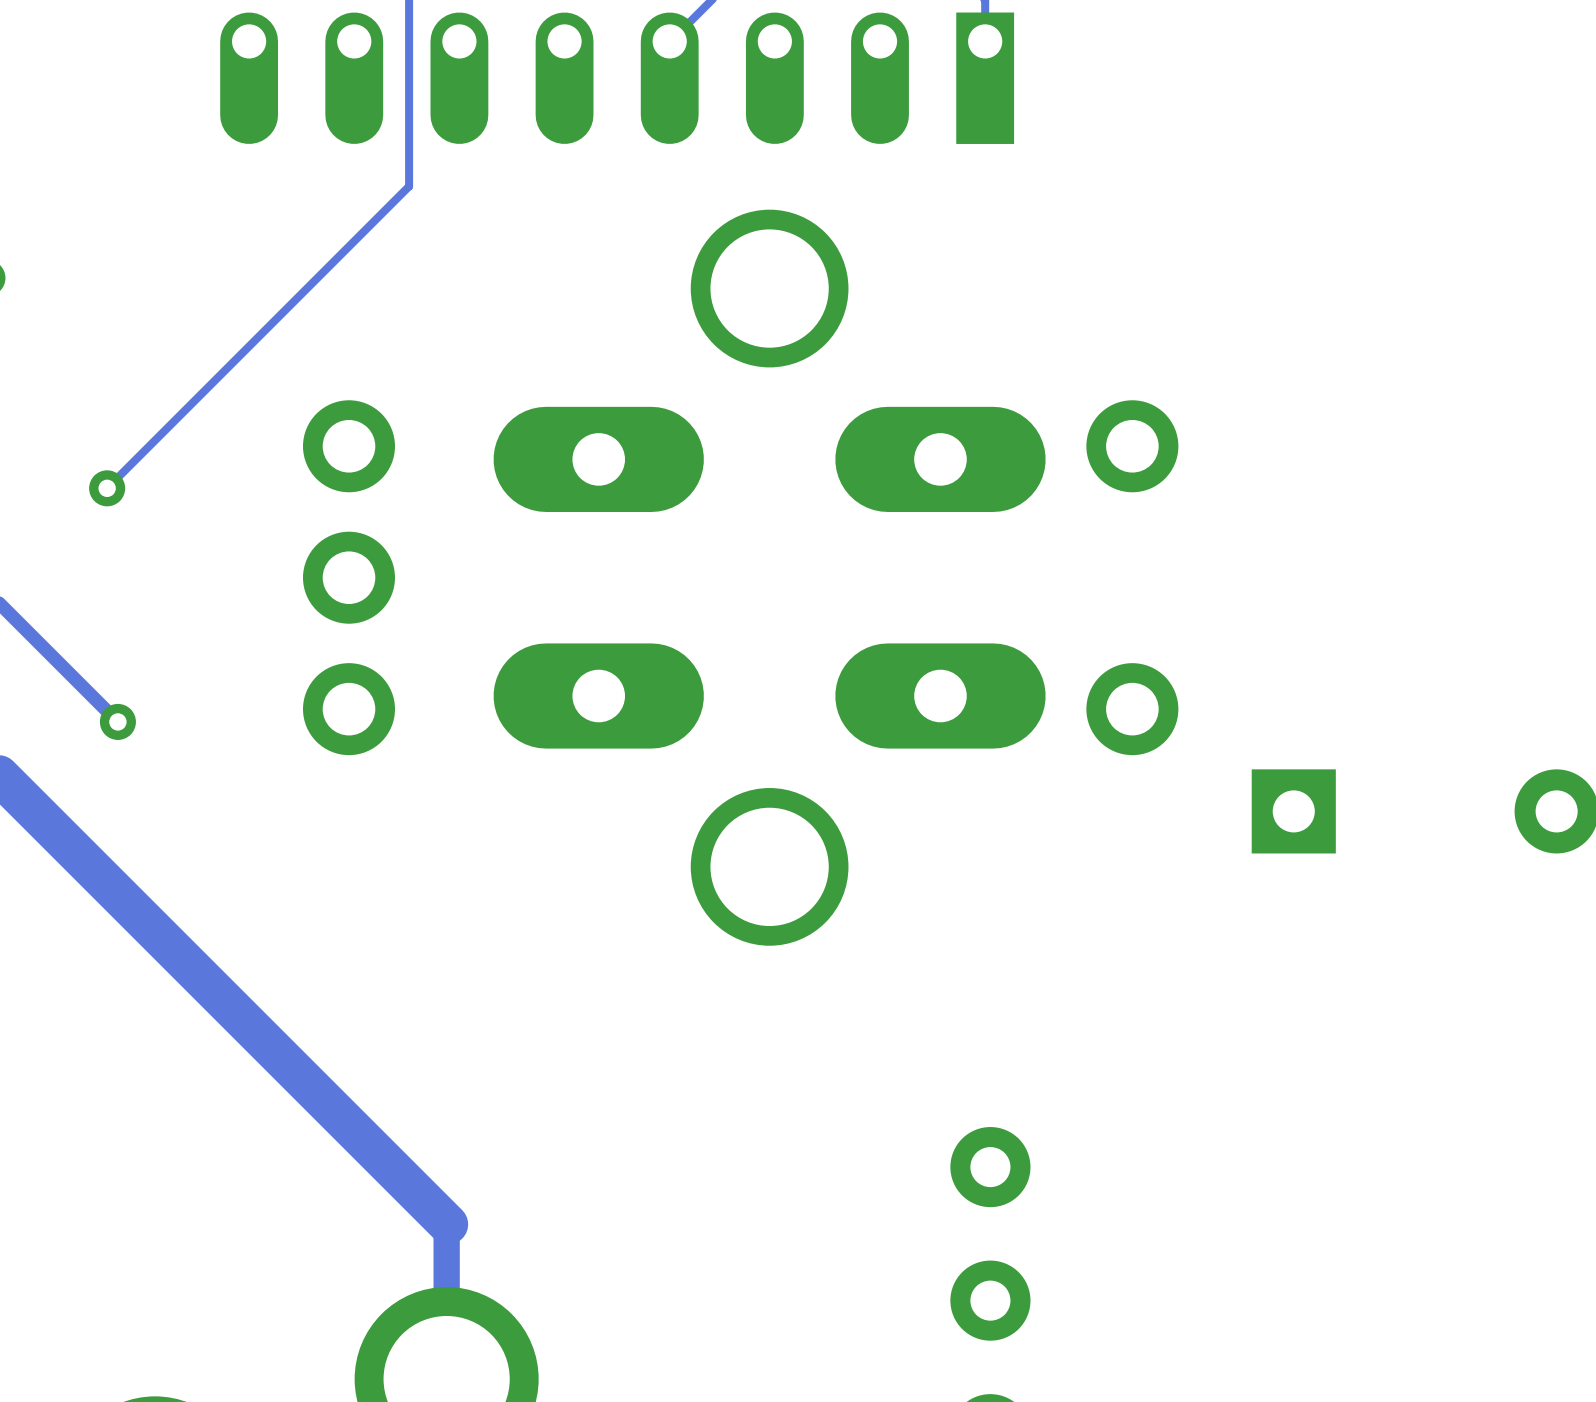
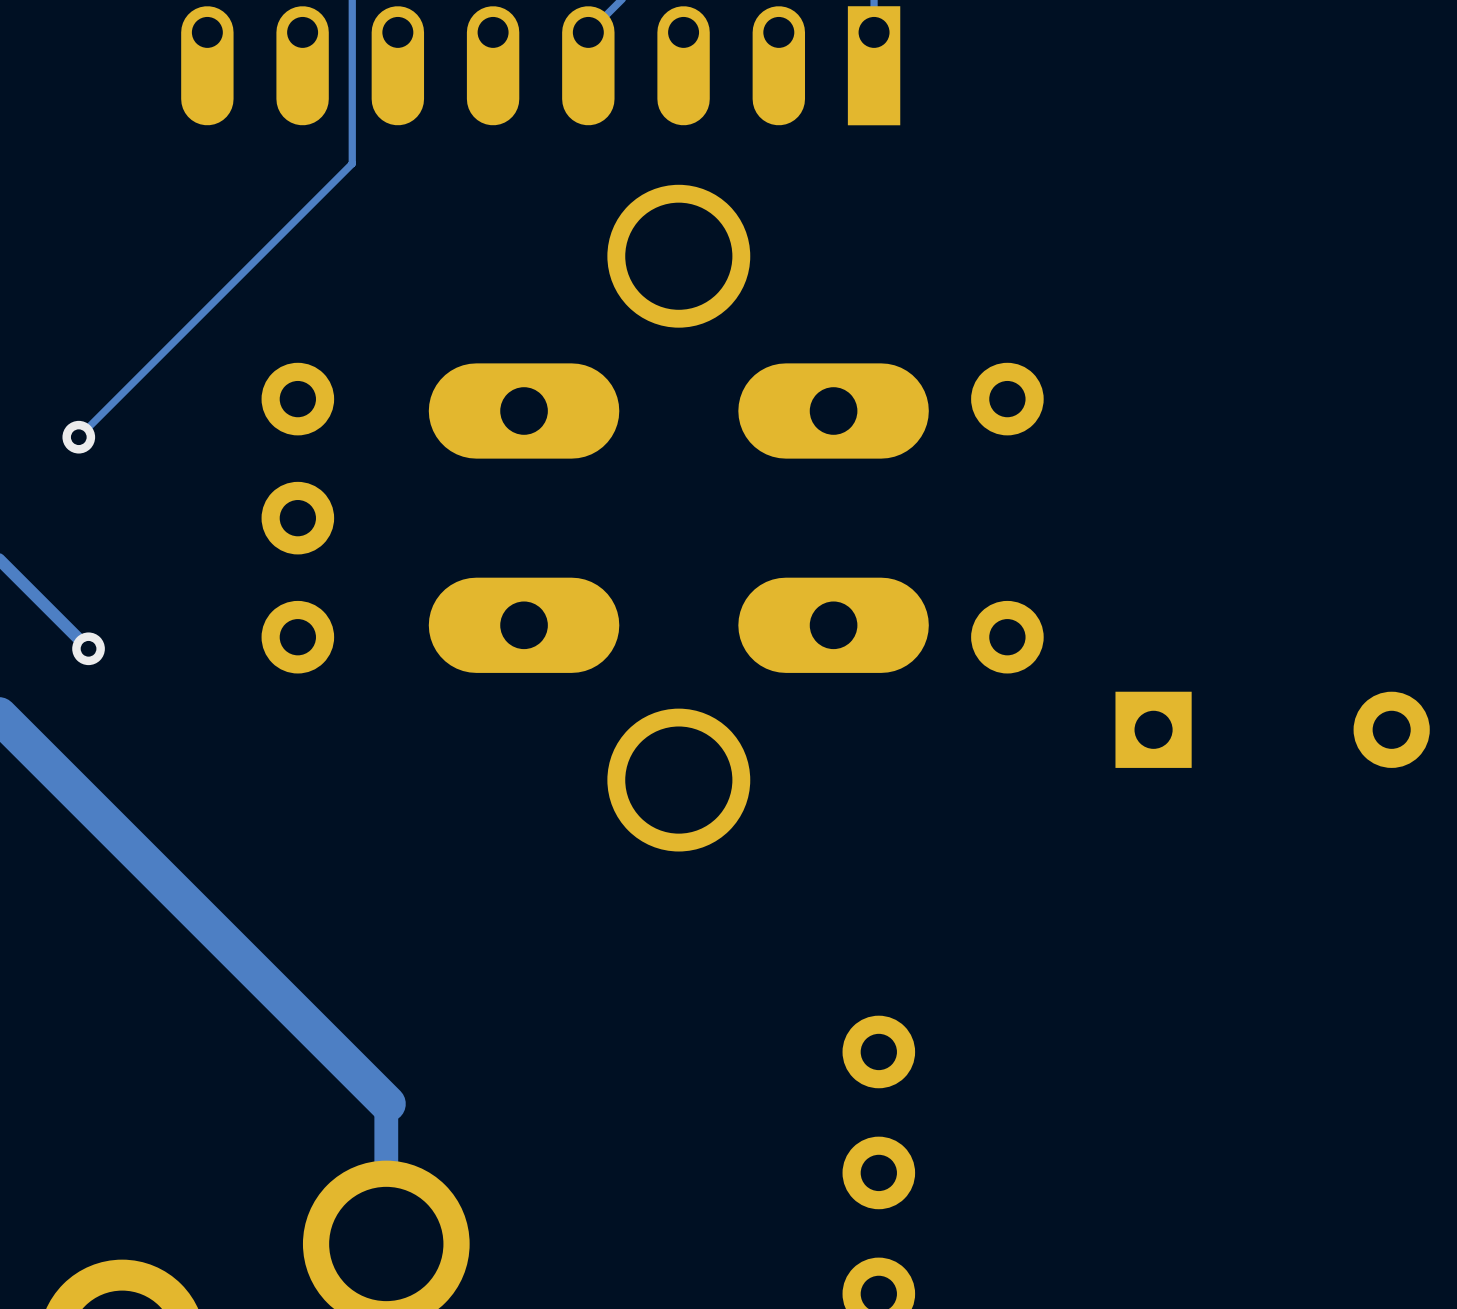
part footprint: [302, 209, 1179, 946] -> [261, 184, 1044, 852]

